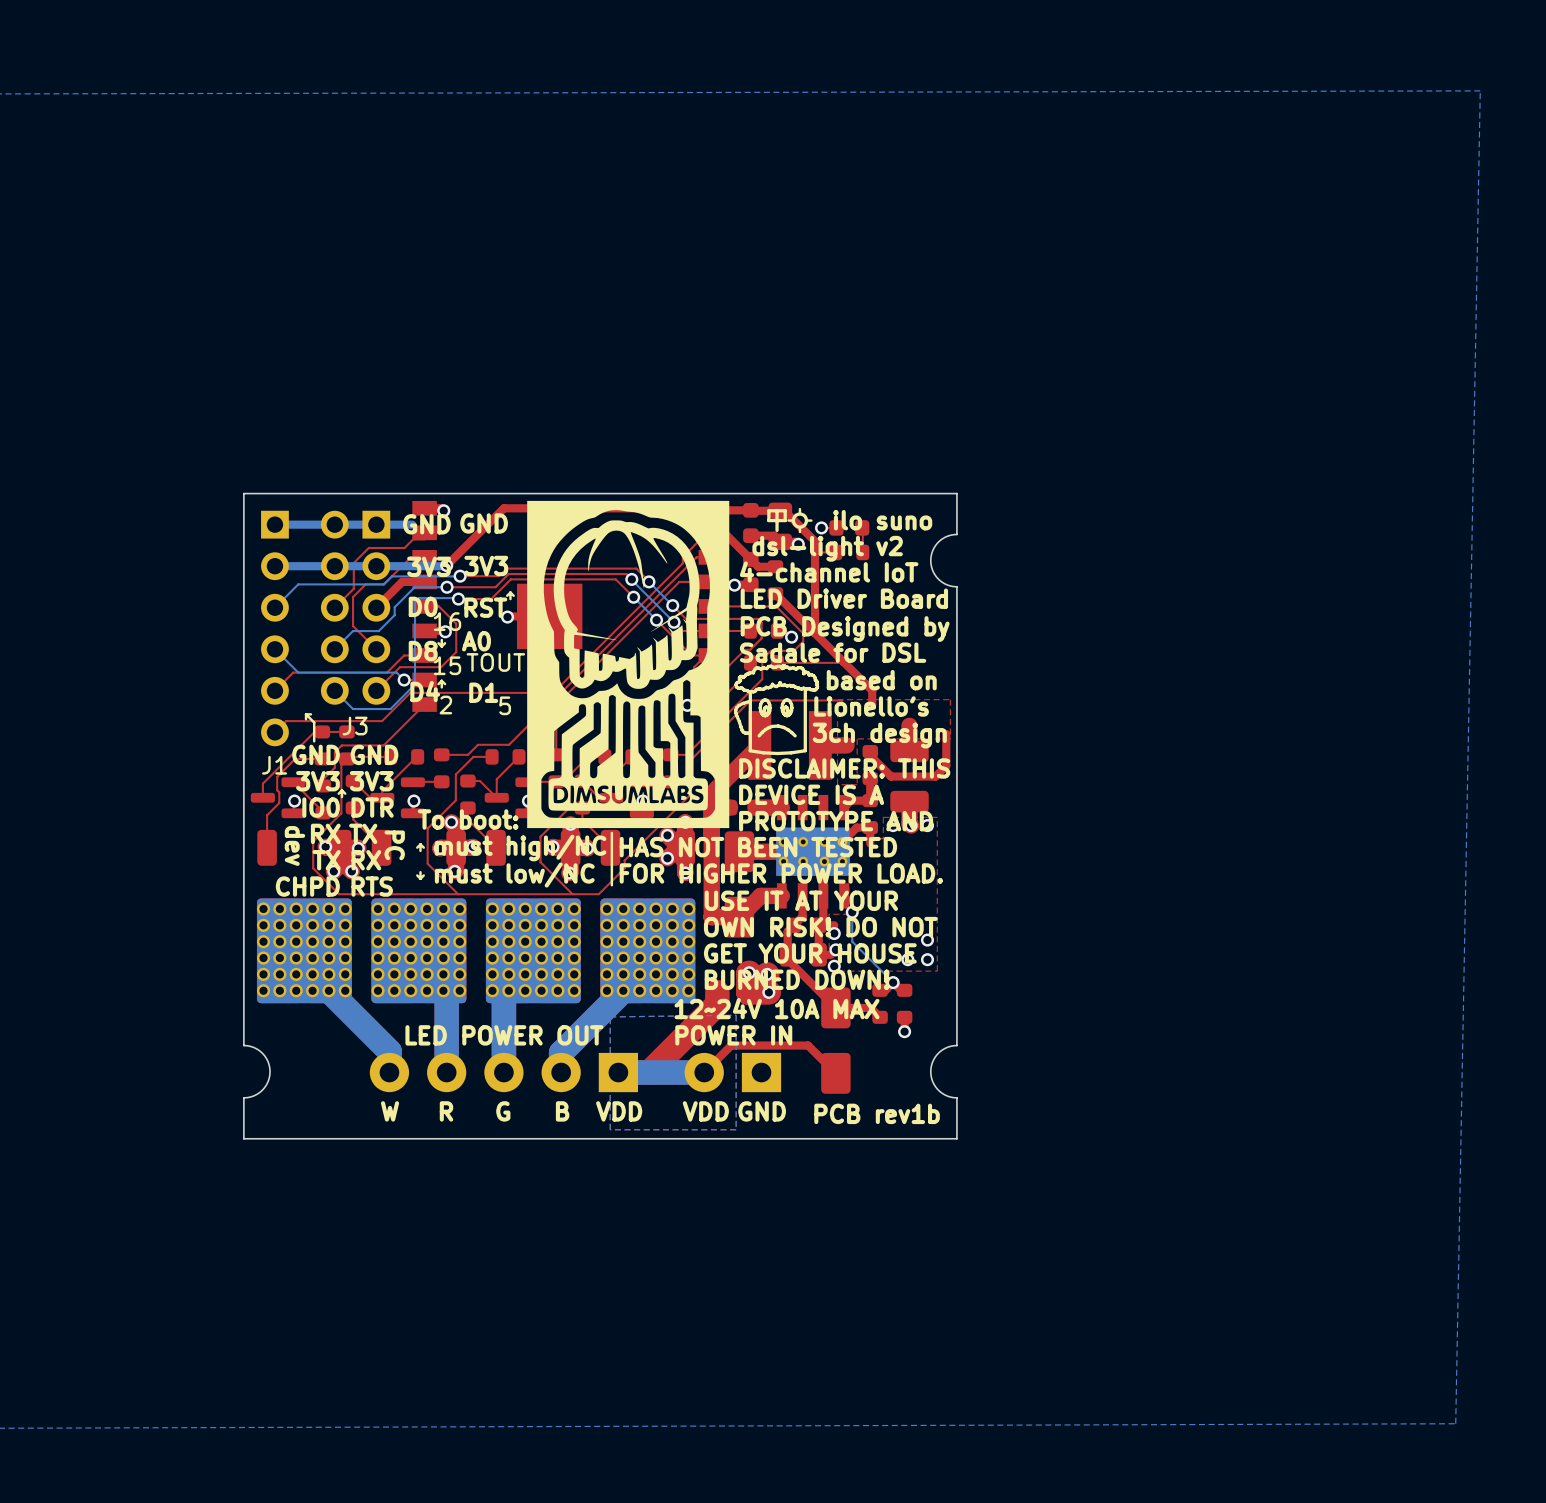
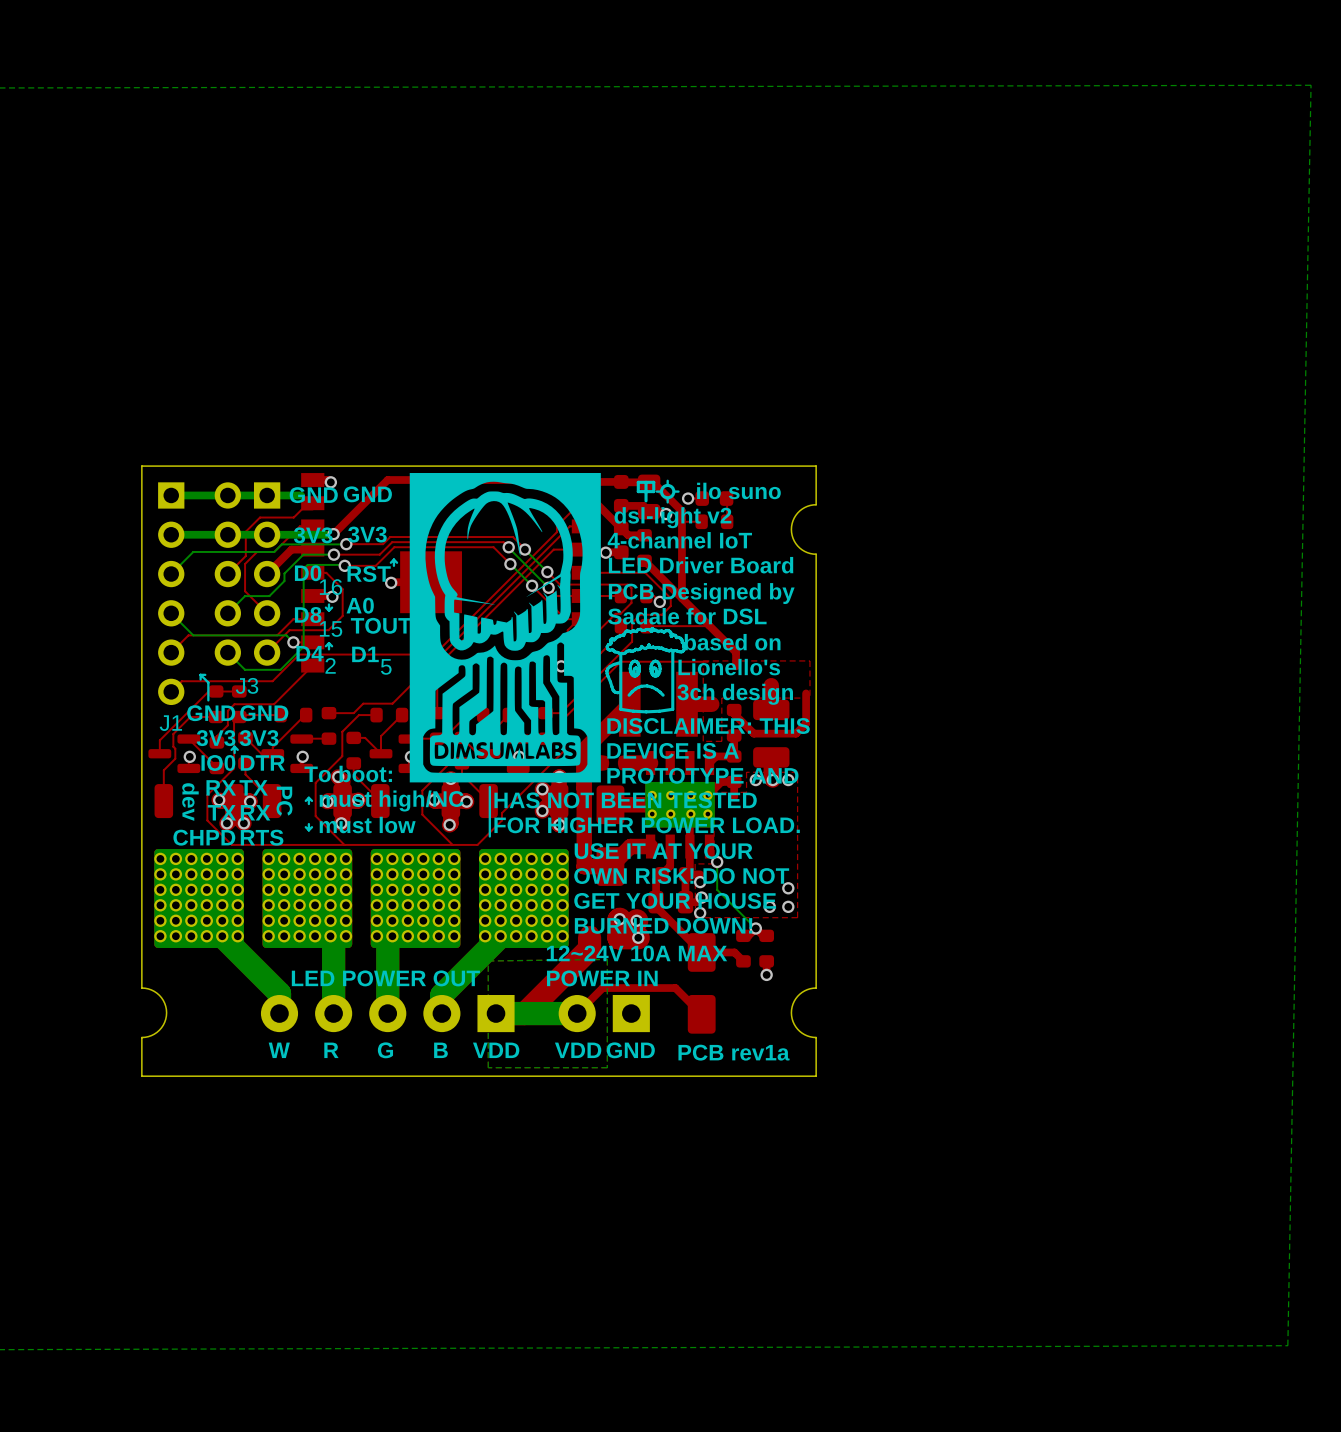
text: must low/NC (514, 875) -> must low (367, 825)
text: PCB rev1b (877, 1113) -> PCB rev1a (734, 1052)

